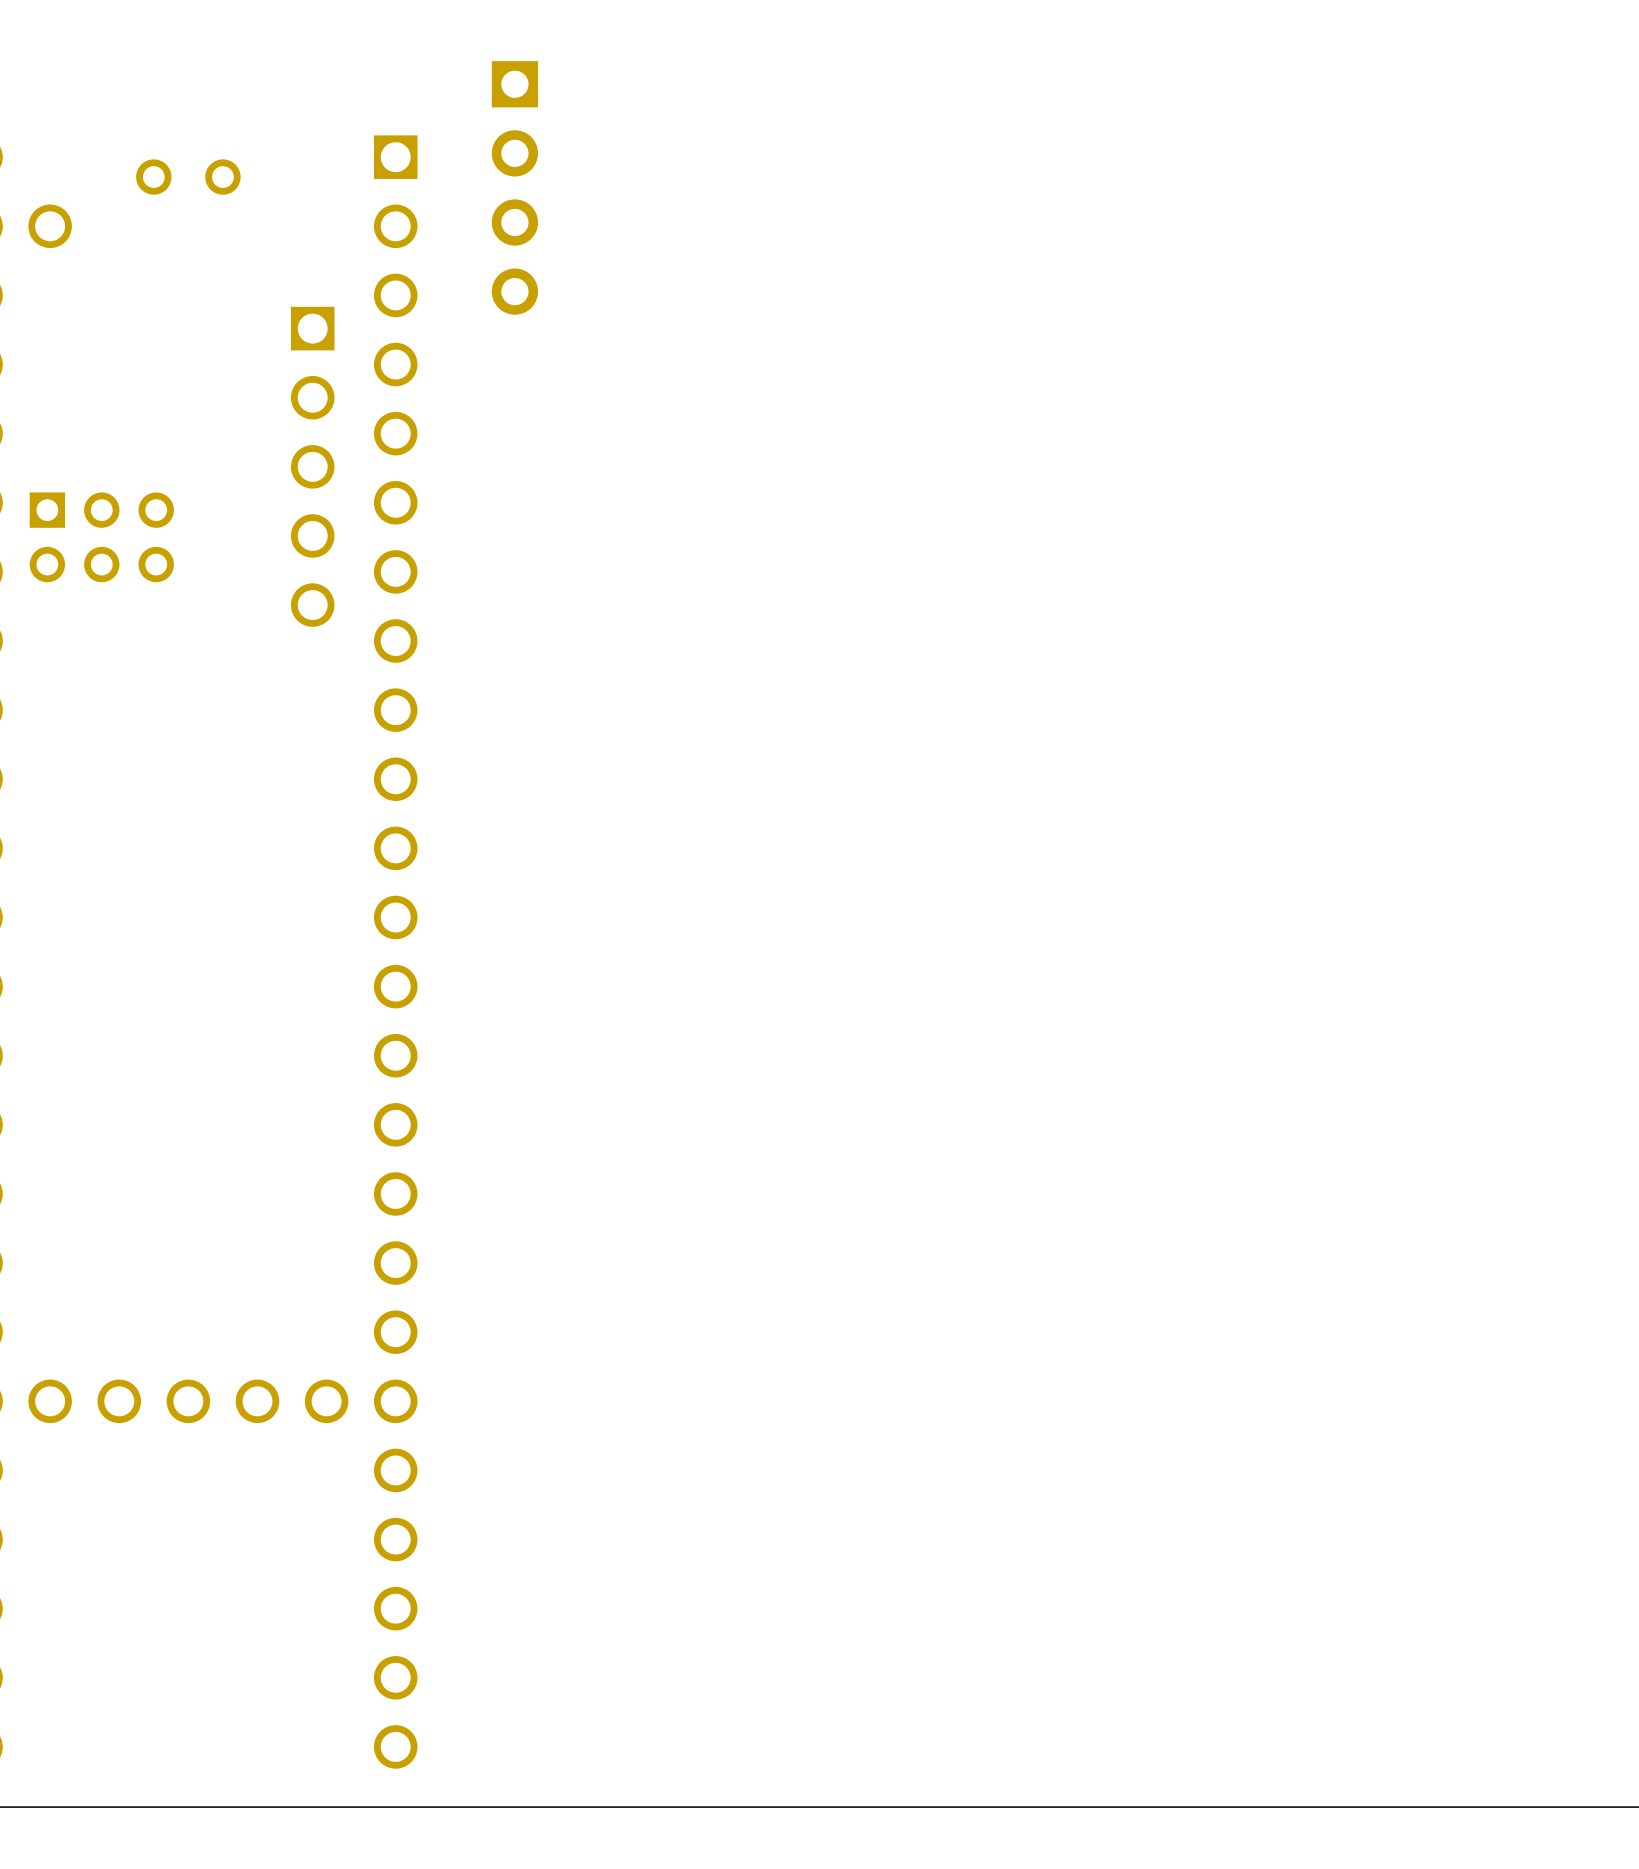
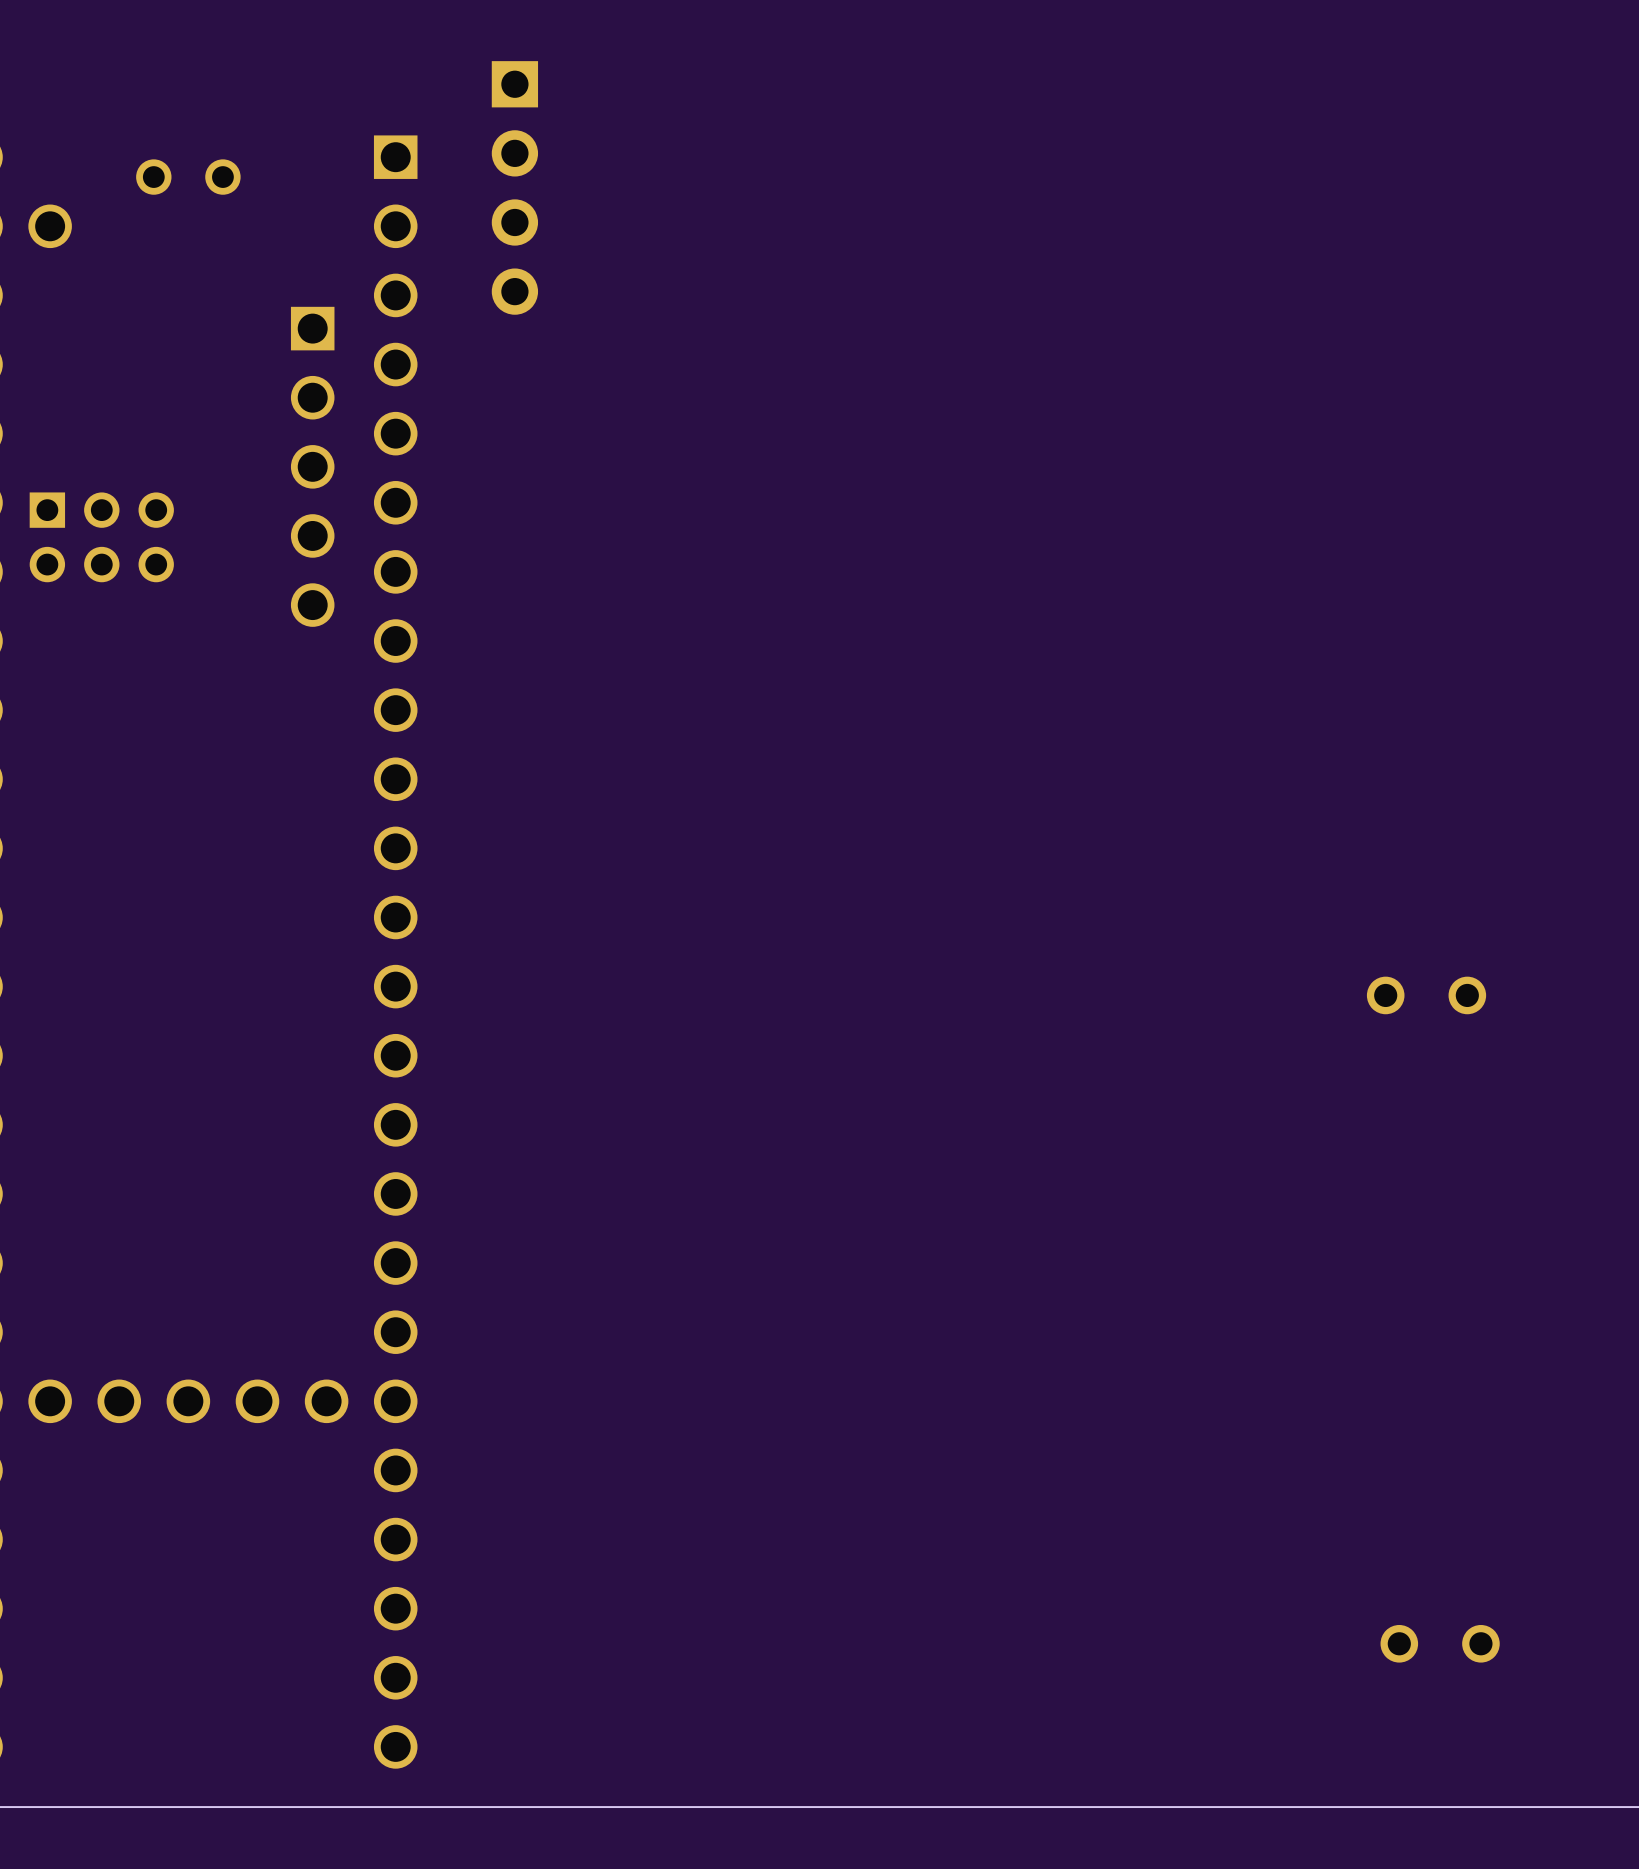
part: none -> (1426, 995)
part: none -> (1440, 1643)

